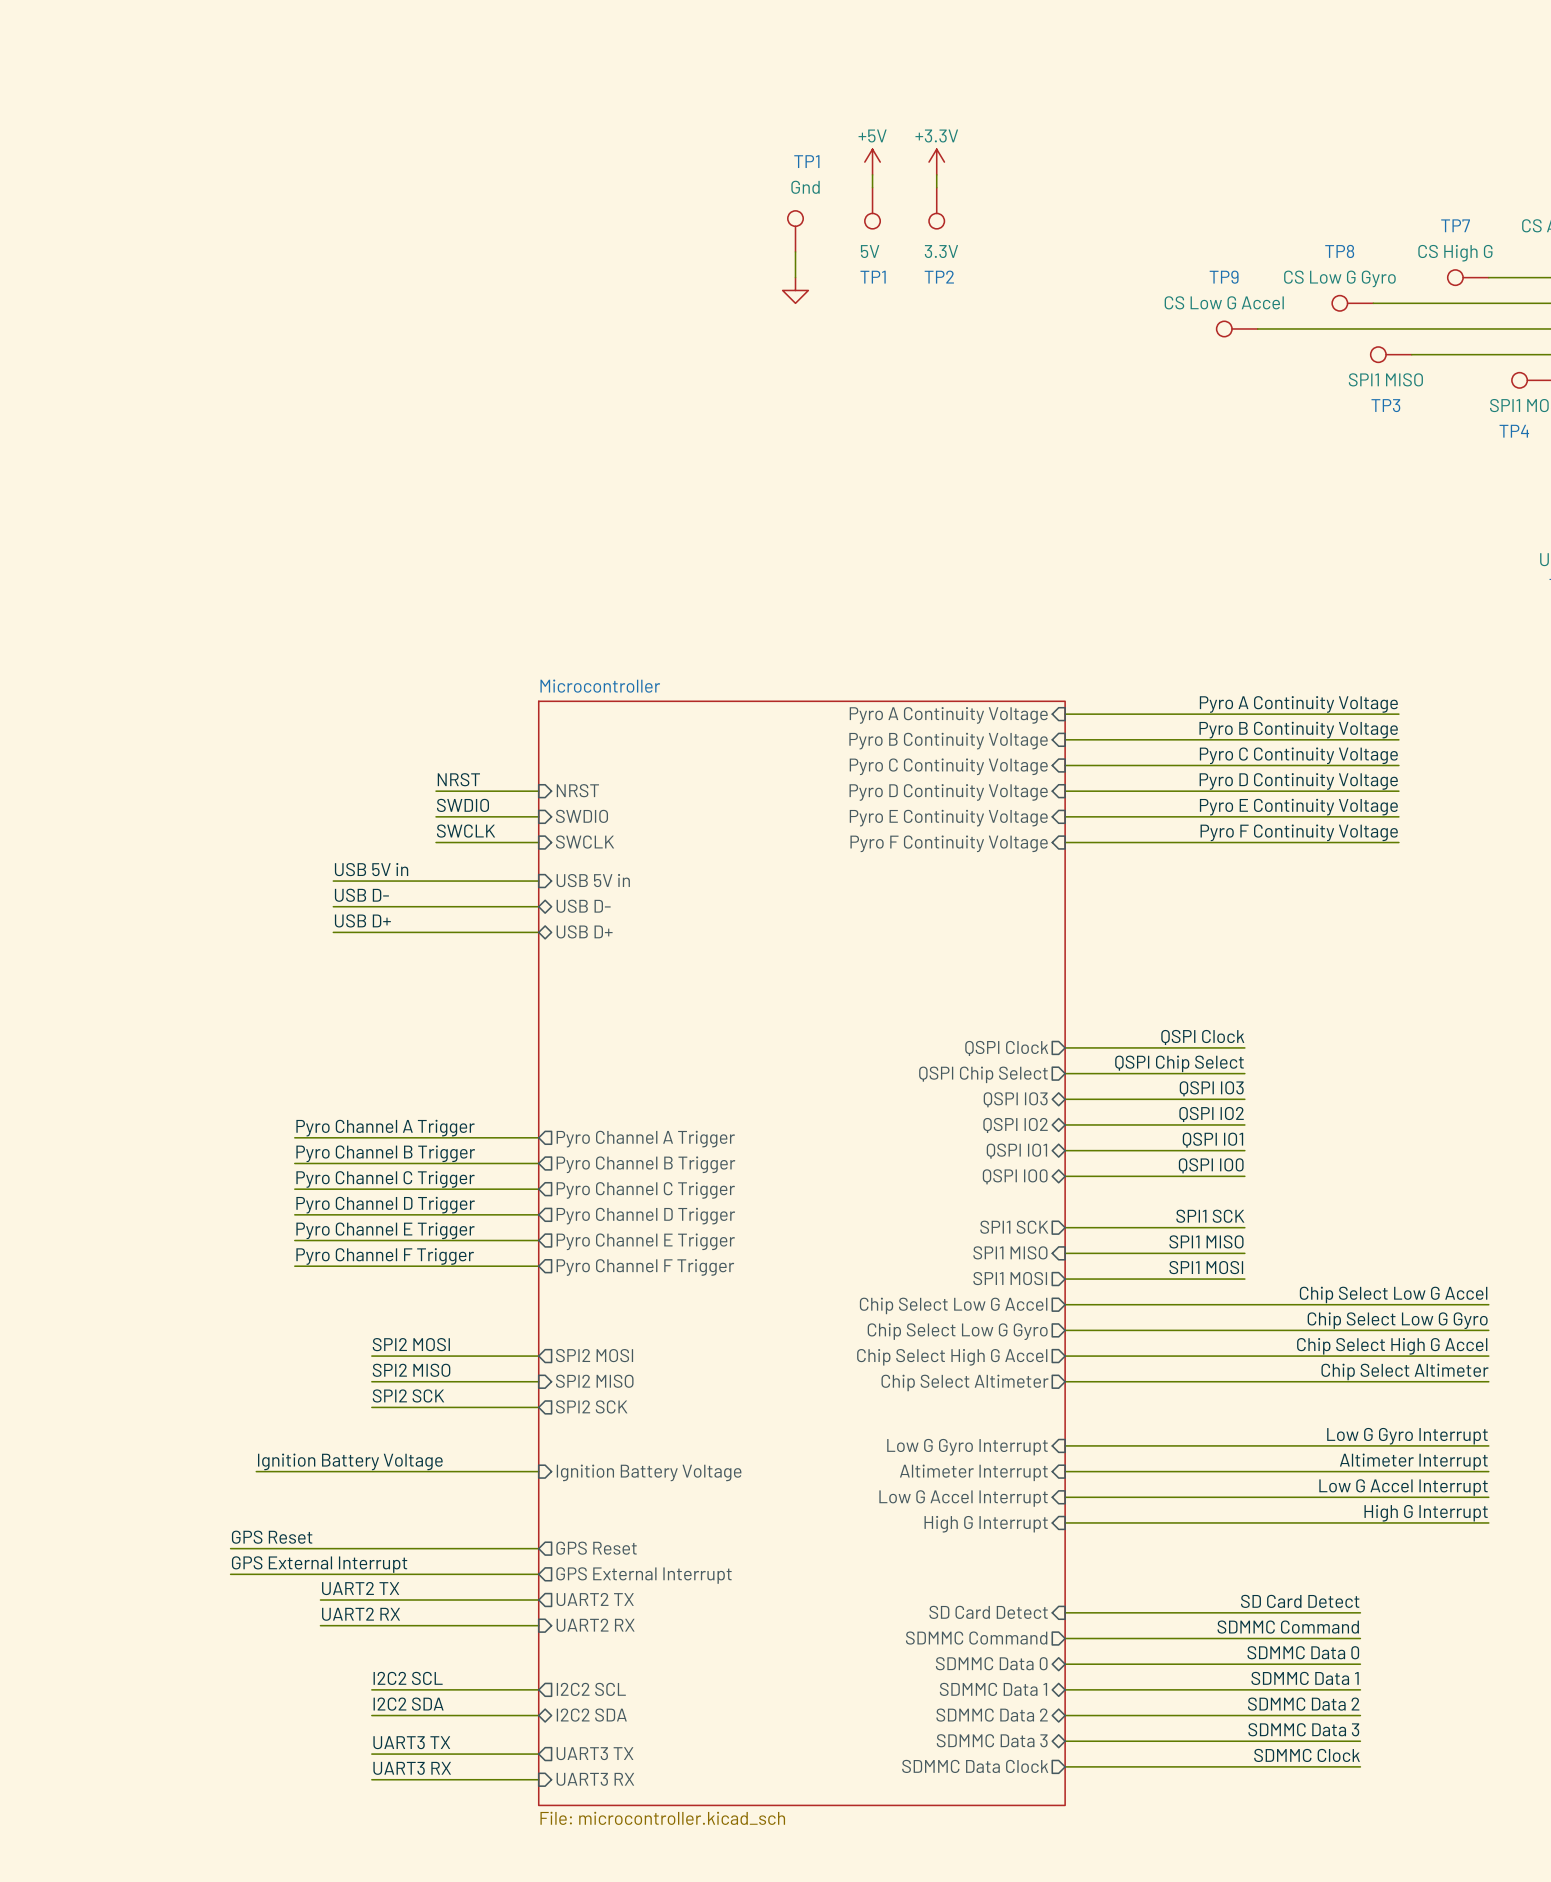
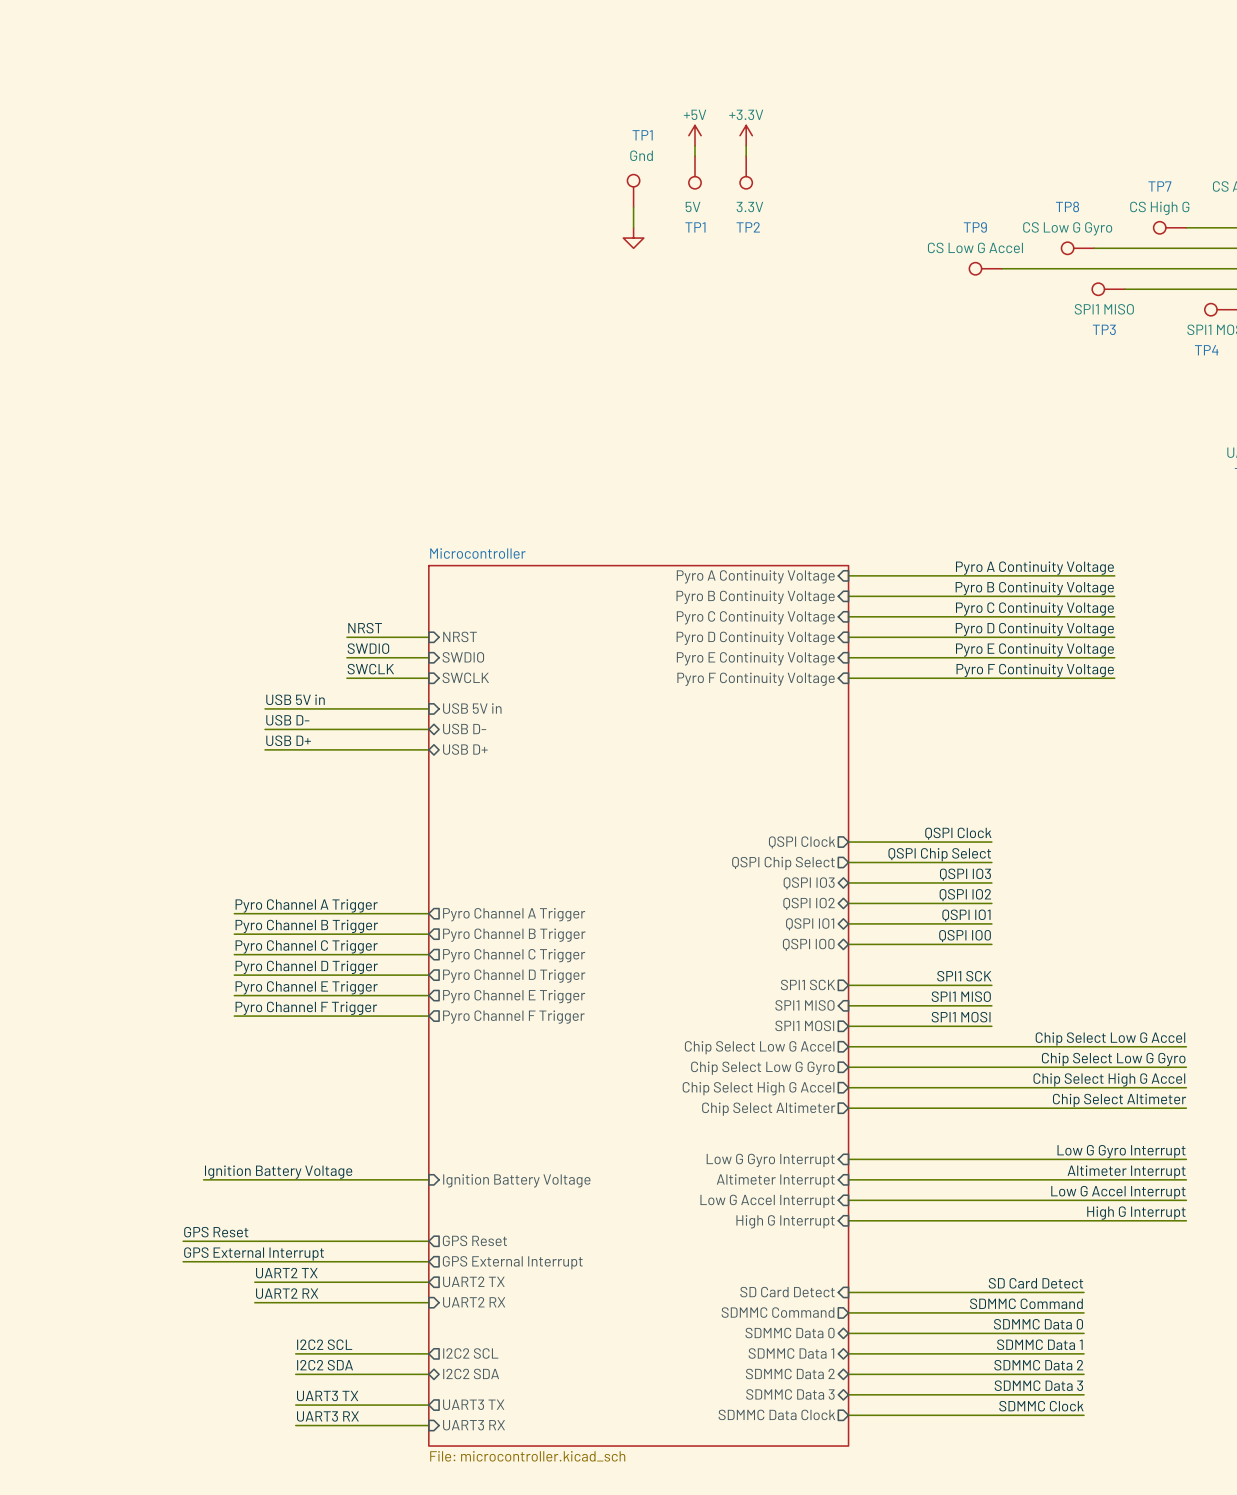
label: SPI2 MOSI (411, 1344) -> none
sheet pin: SPI2 MOSI (594, 1355) -> none
wire: (371, 1356) (538, 1356) -> none
label: SPI2 MISO (411, 1370) -> none
wire: (371, 1381) (538, 1381) -> none
sheet pin: SPI2 MISO (594, 1381) -> none
label: SPI2 SCK (408, 1395) -> none
sheet pin: SPI2 SCK (591, 1406) -> none
wire: (371, 1407) (538, 1407) -> none

